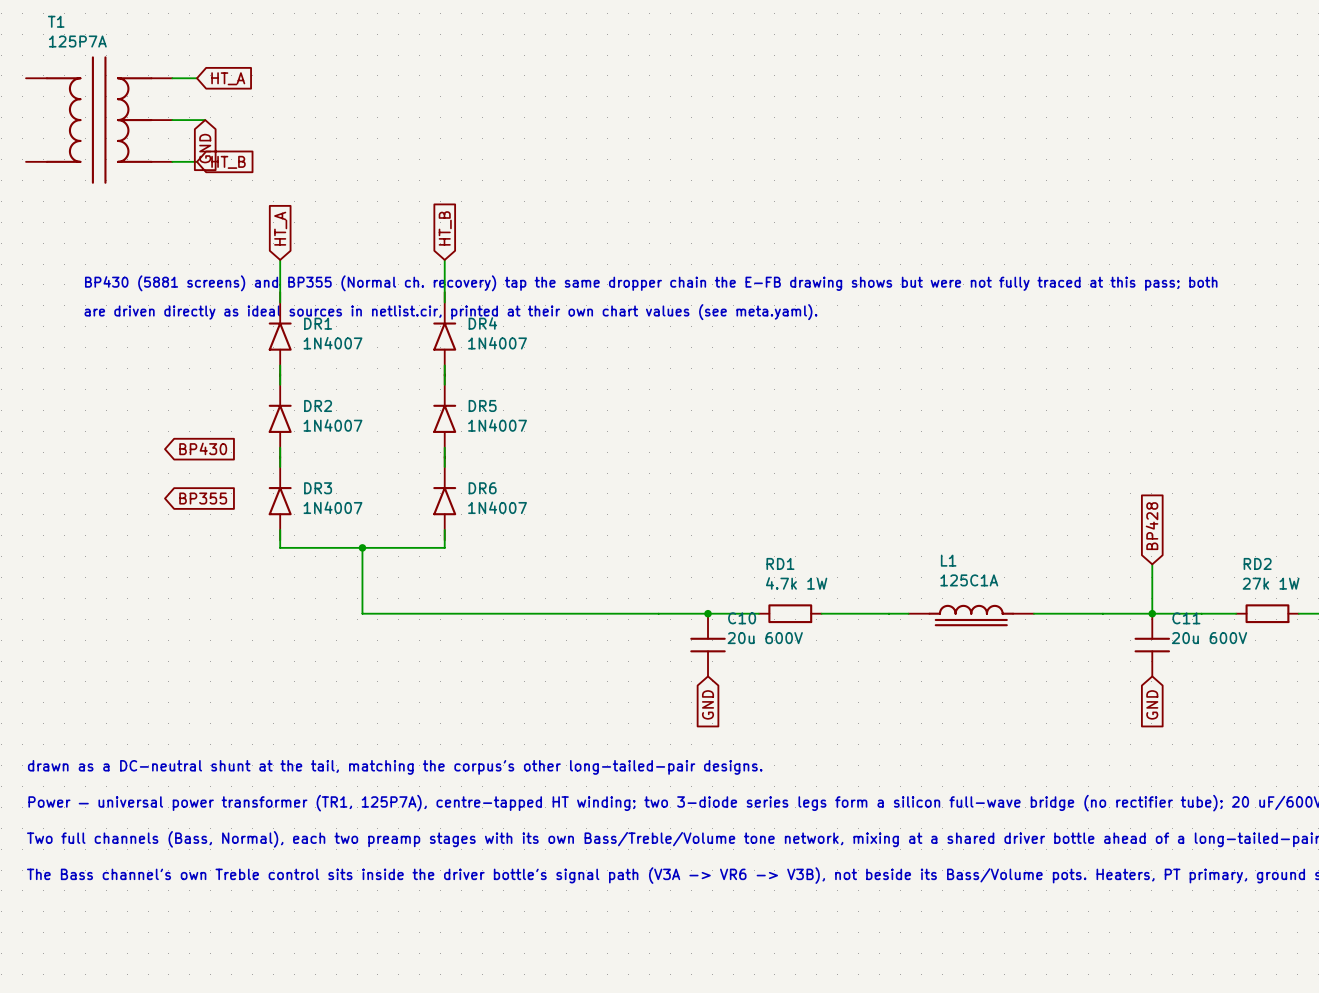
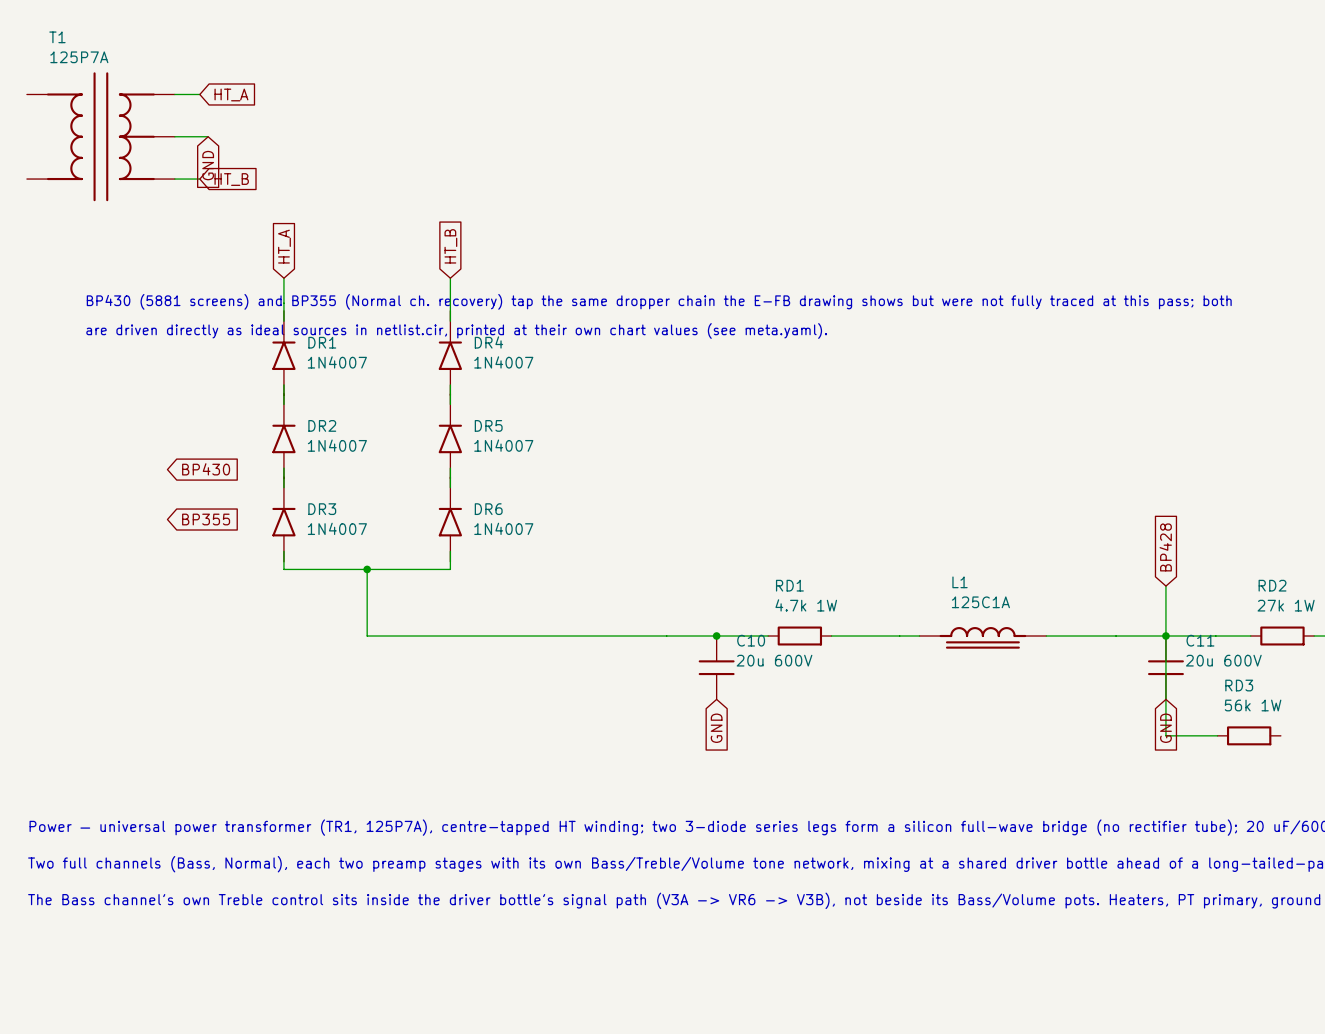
wire: none -> (1165, 636) (1165, 735) (1217, 735)
RD3: none -> 56k 1W (1249, 735)
text: drawn as a DC-neutral shunt at the tail, matching the corpus's other long-tailed-pair designs. (395, 767) -> none

